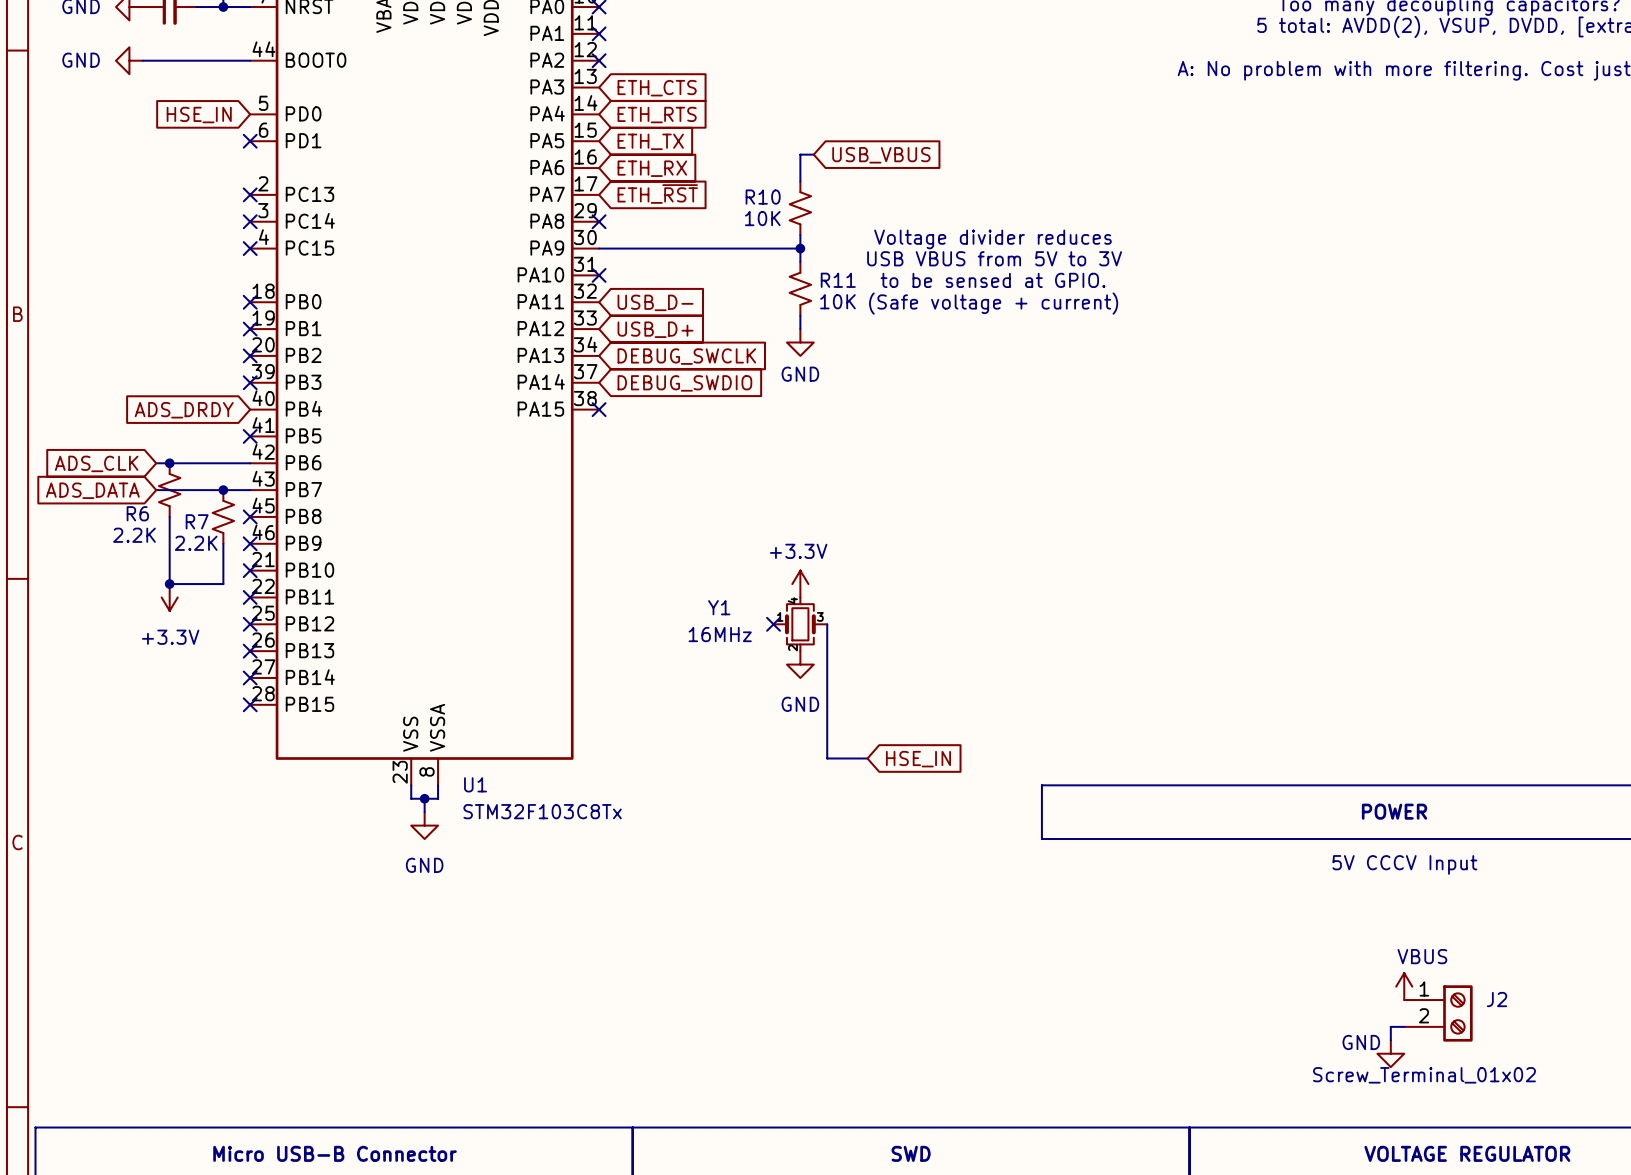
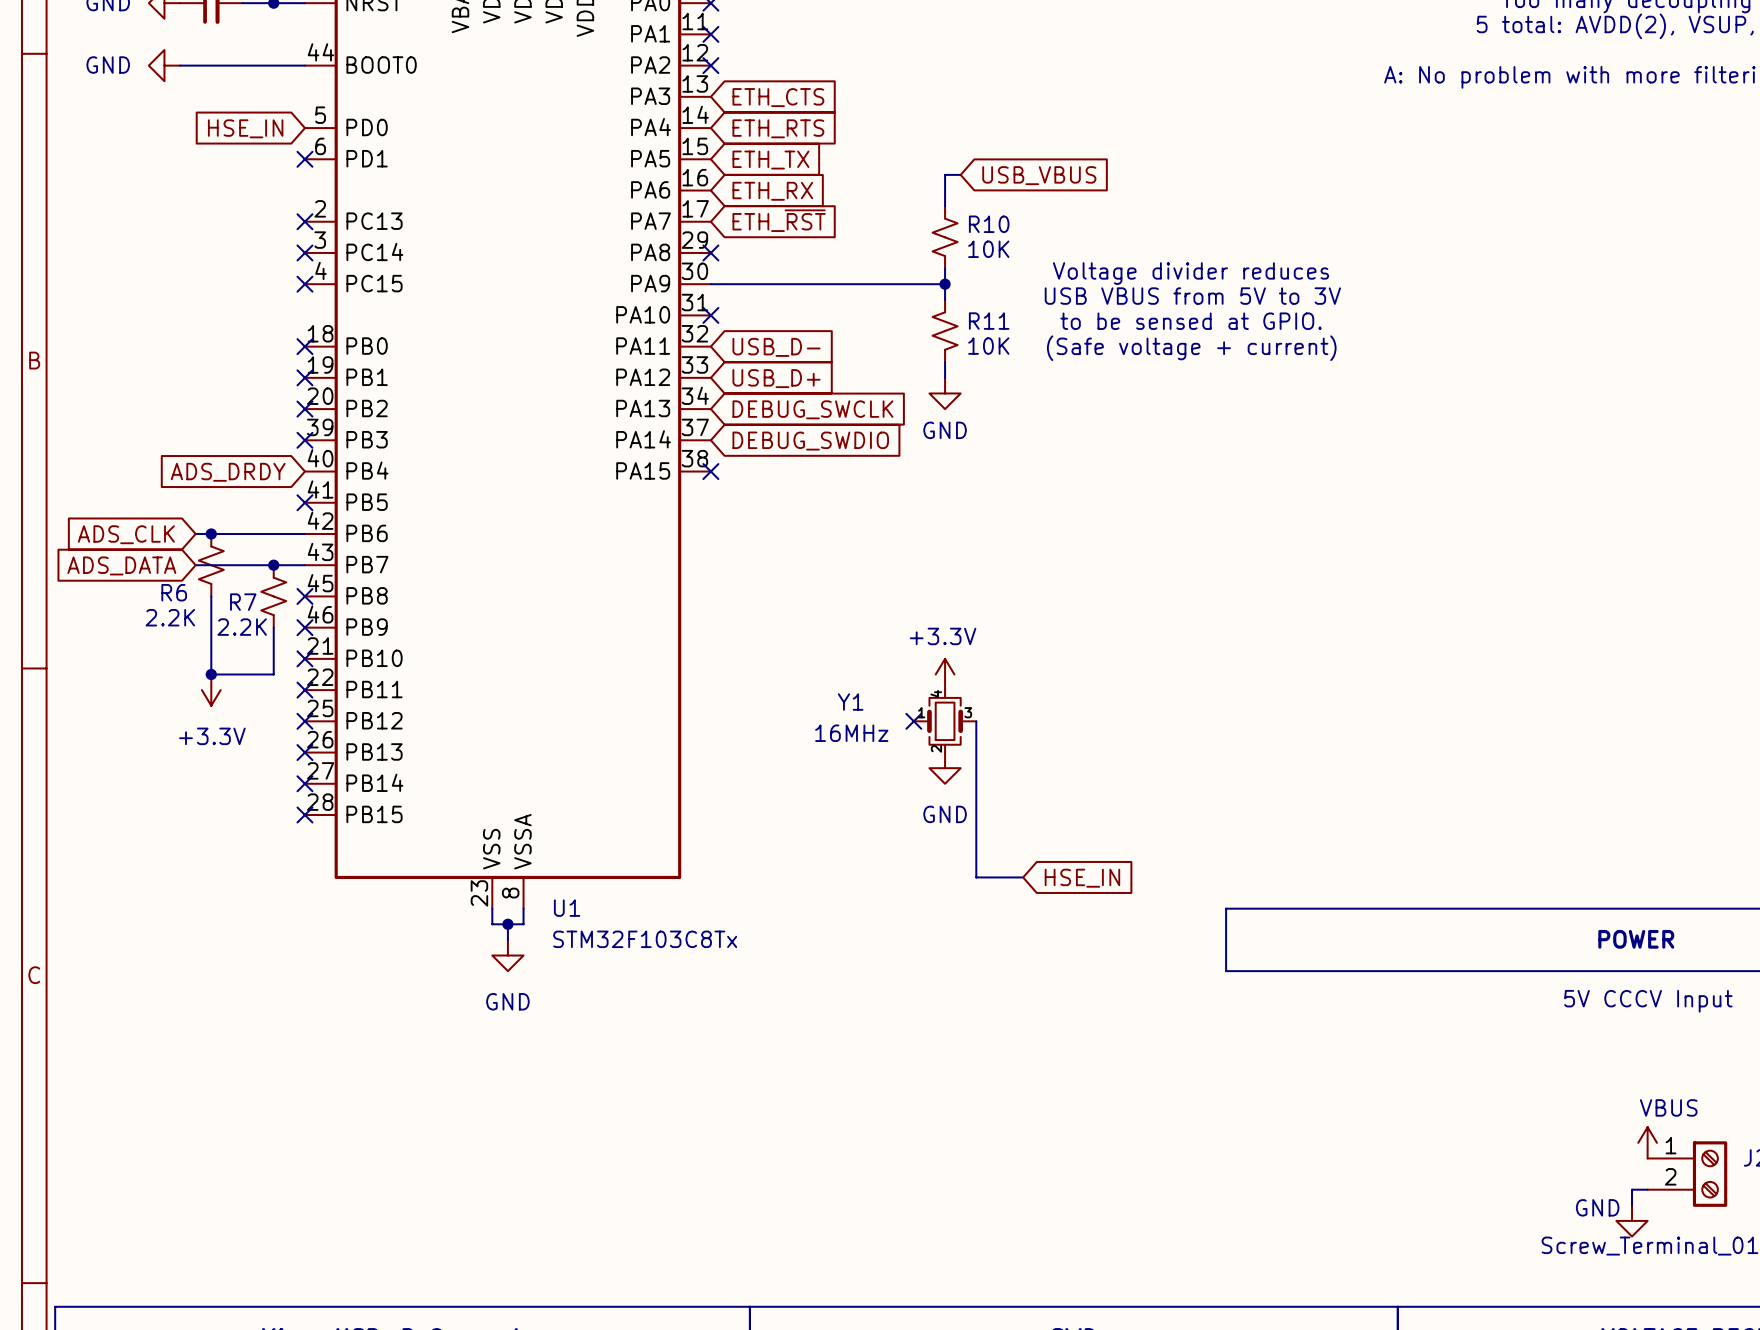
R10 name position: R10 (763, 197) -> R10 (989, 224)
R10 value position: 10K (762, 218) -> 10K (988, 249)
text position: Voltage divider reduces (992, 239) -> Voltage divider reduces (1191, 273)
text position: USB VBUS from 5V to 3V (994, 258) -> USB VBUS from 5V to 3V (1192, 296)
text position: to be sensed at GPIO. (992, 280) -> to be sensed at GPIO. (1191, 321)
text position: (Safe voltage + current) (993, 303) -> (Safe voltage + current) (1191, 348)

